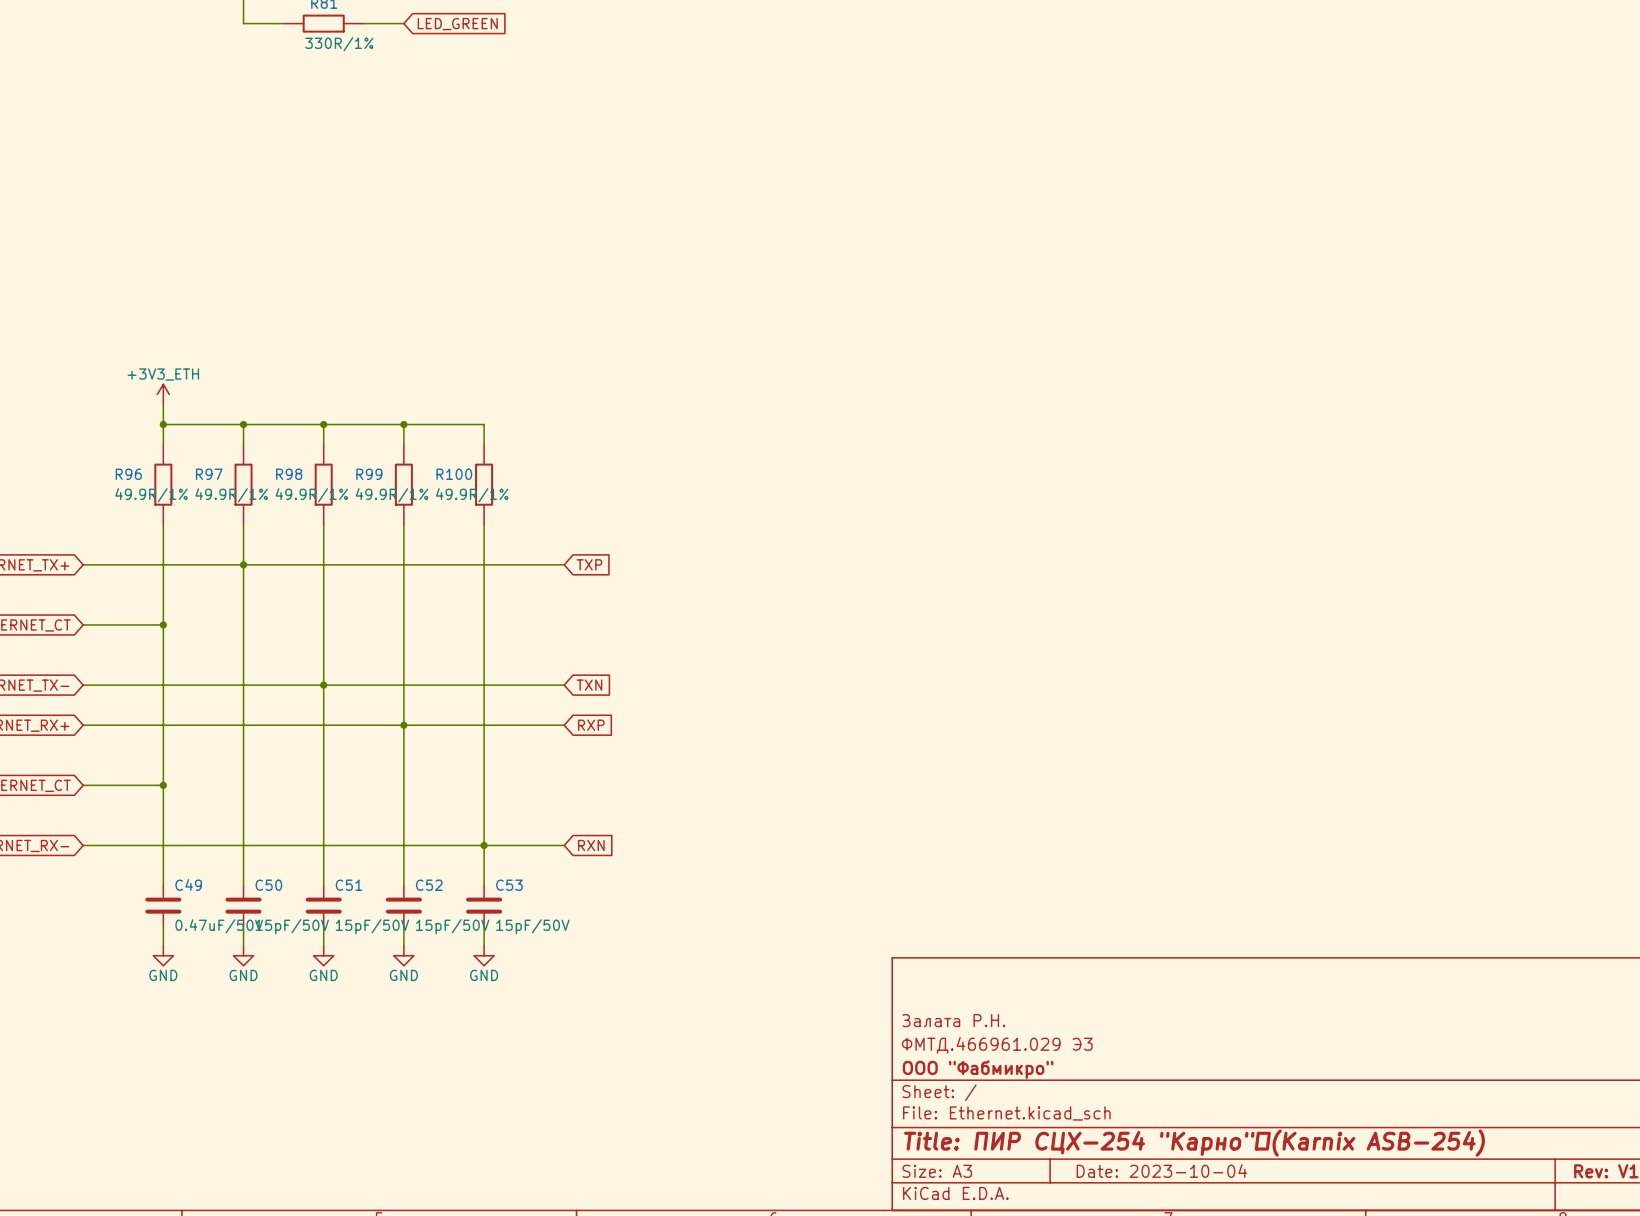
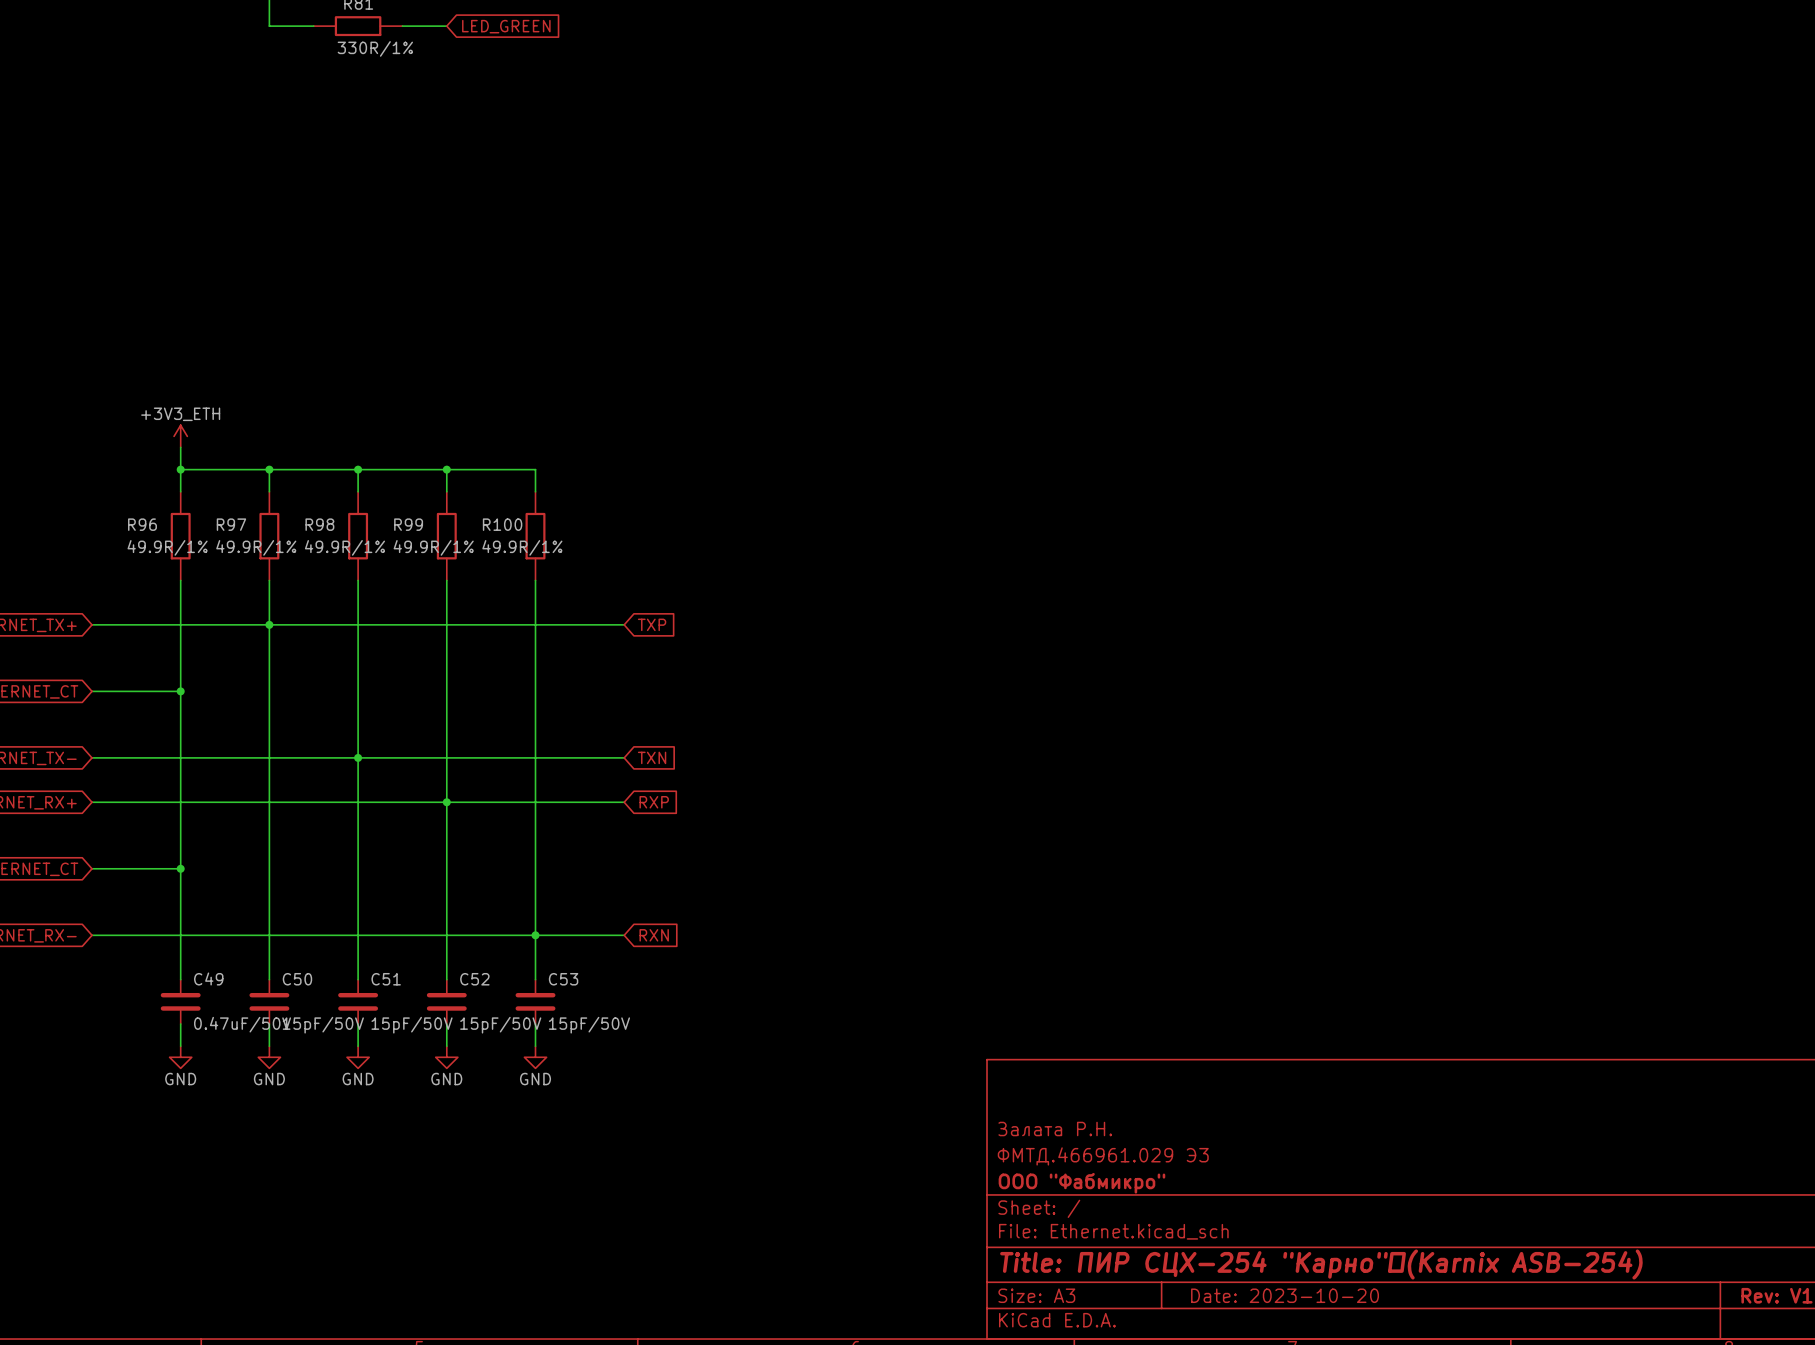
title block: Date: 2023-10-04 (1161, 1171) -> Date: 2023-10-20 (1285, 1295)

